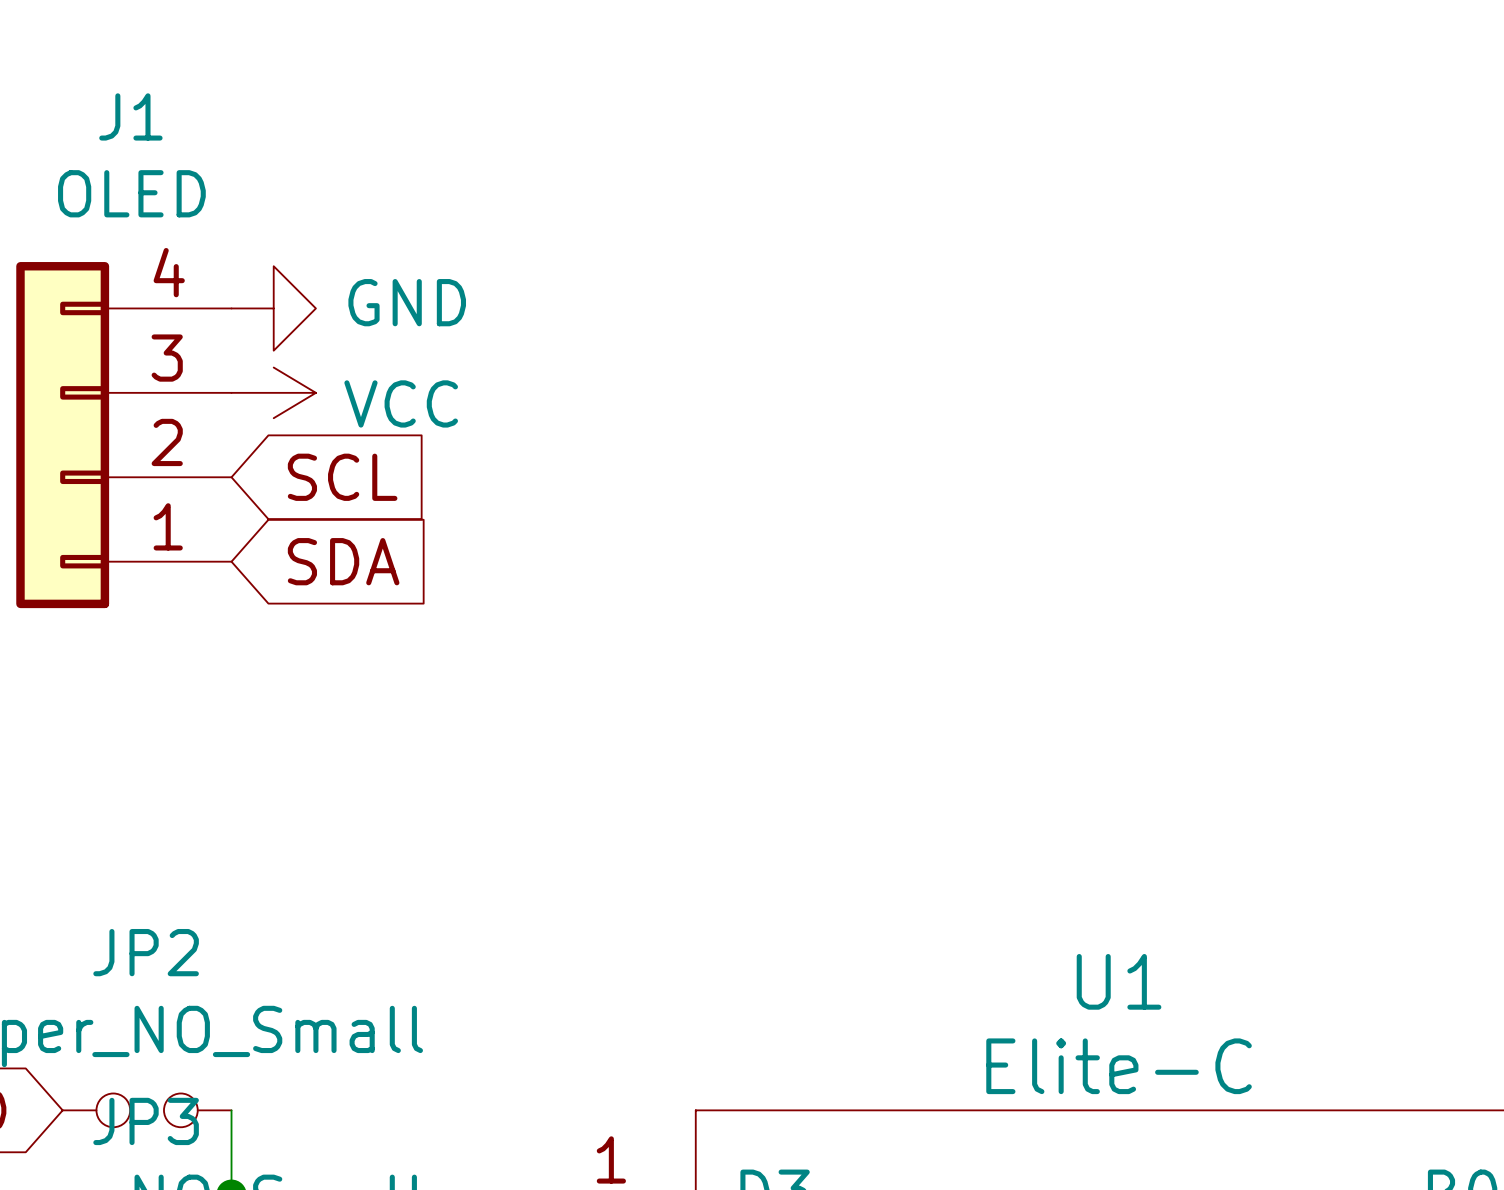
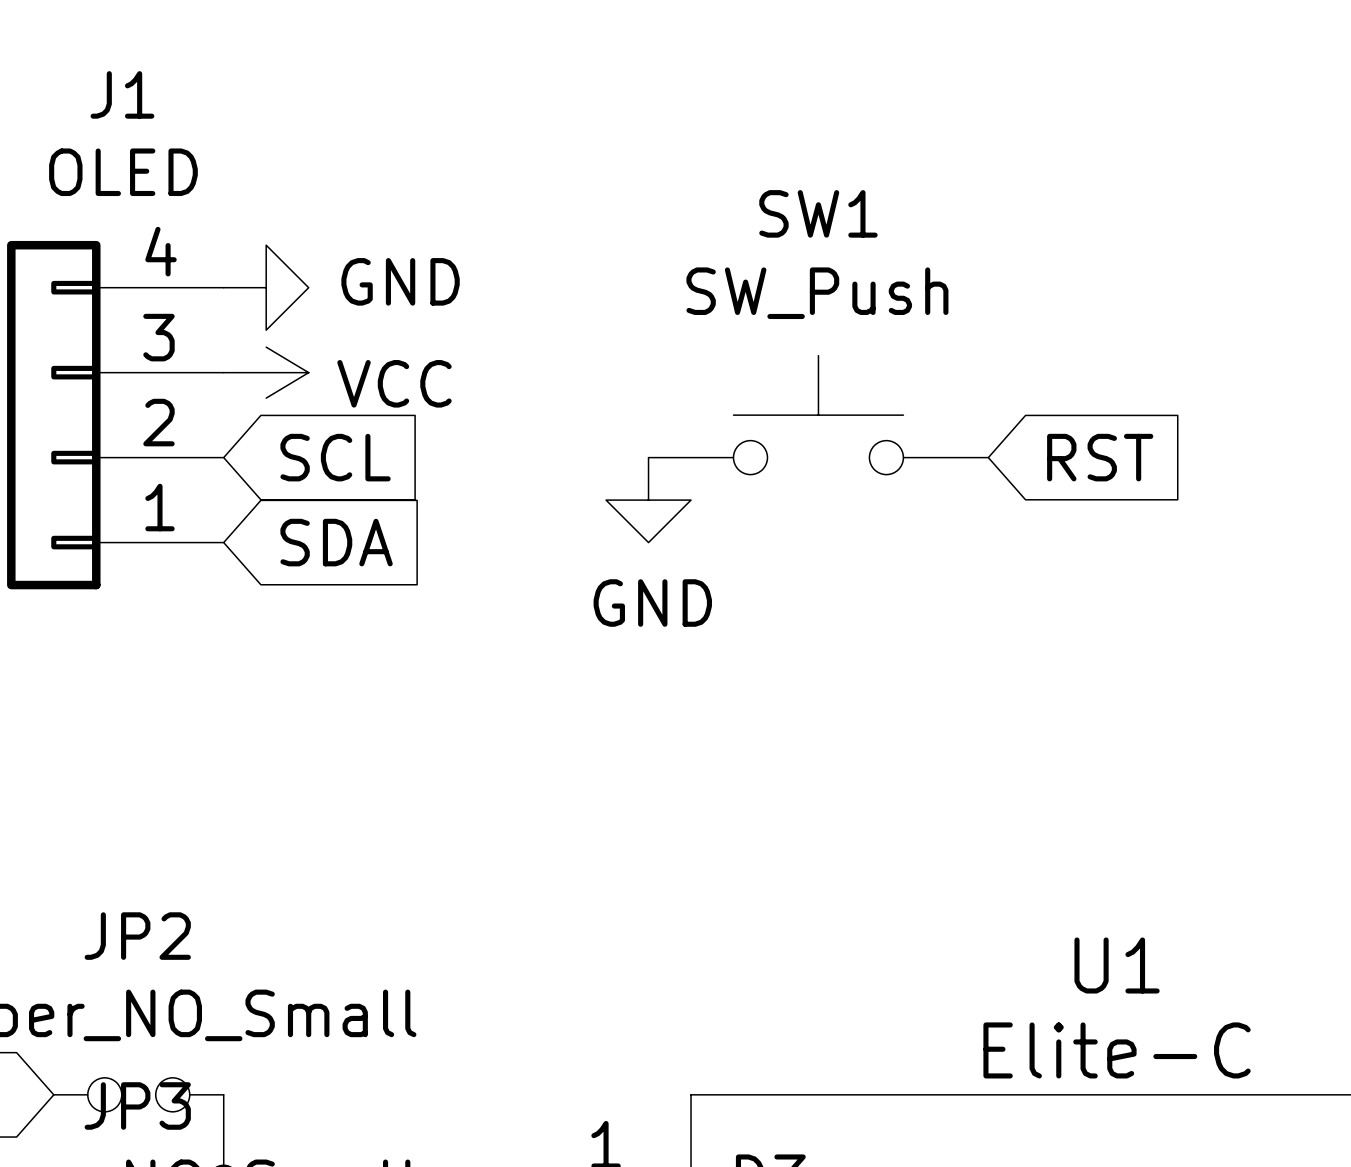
SW1: none -> SW_Push (818, 415)
global label: none -> RST (1100, 457)
power symbol: none -> GND (648, 500)

